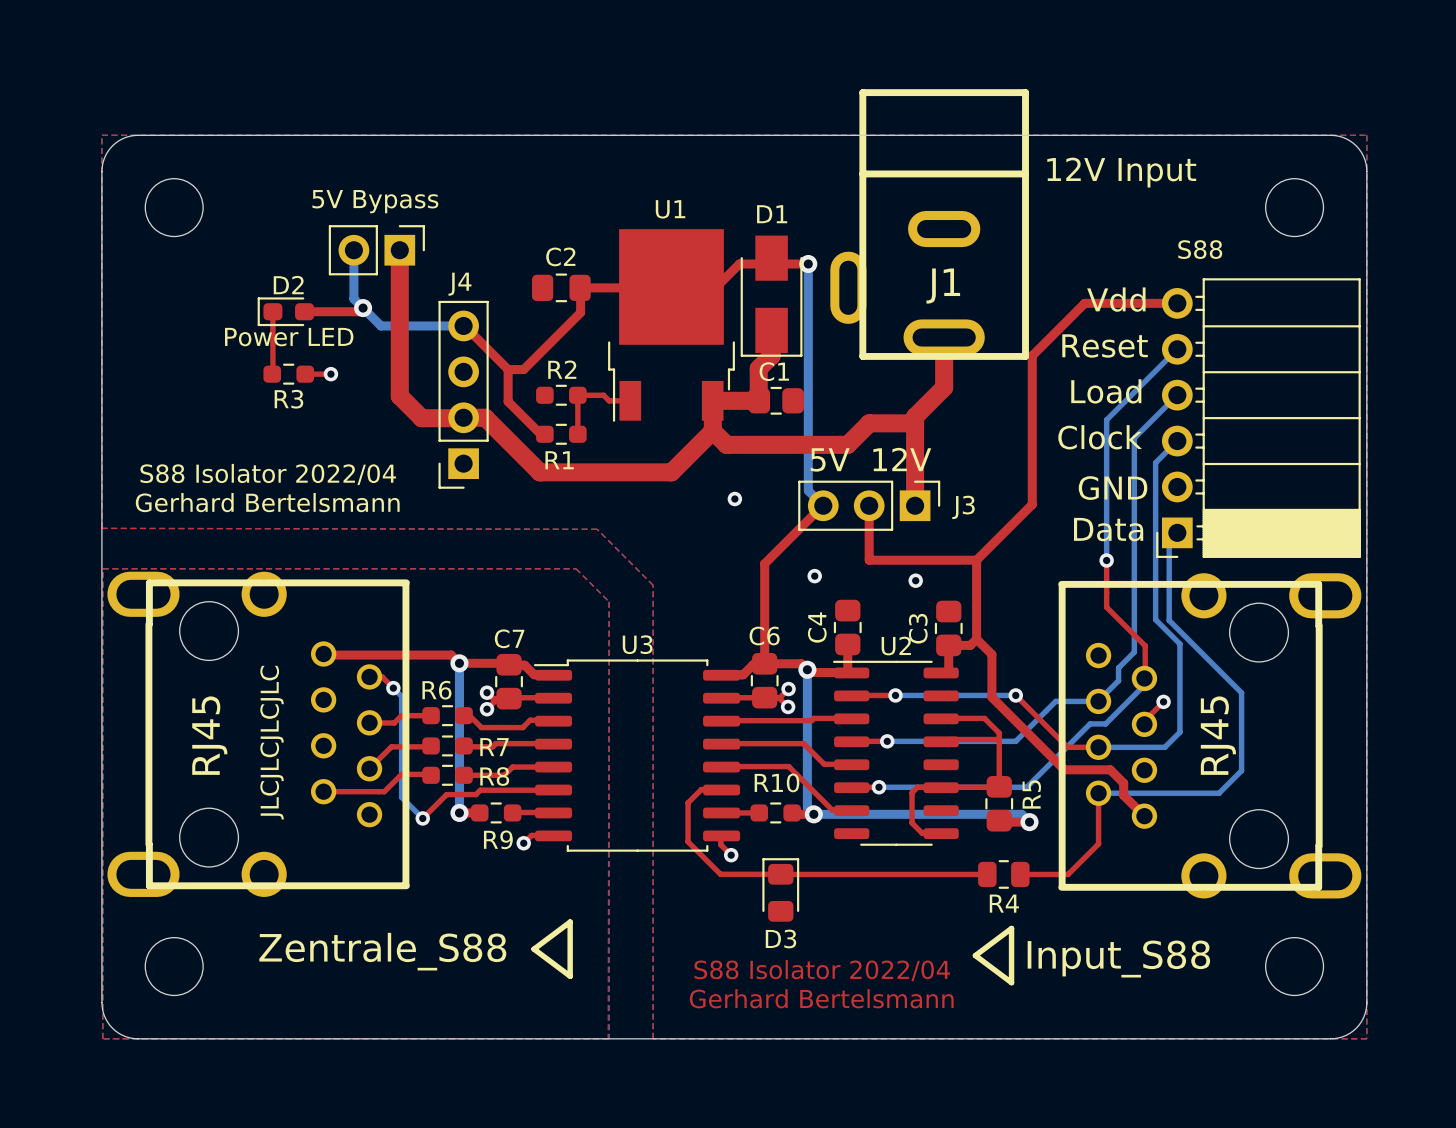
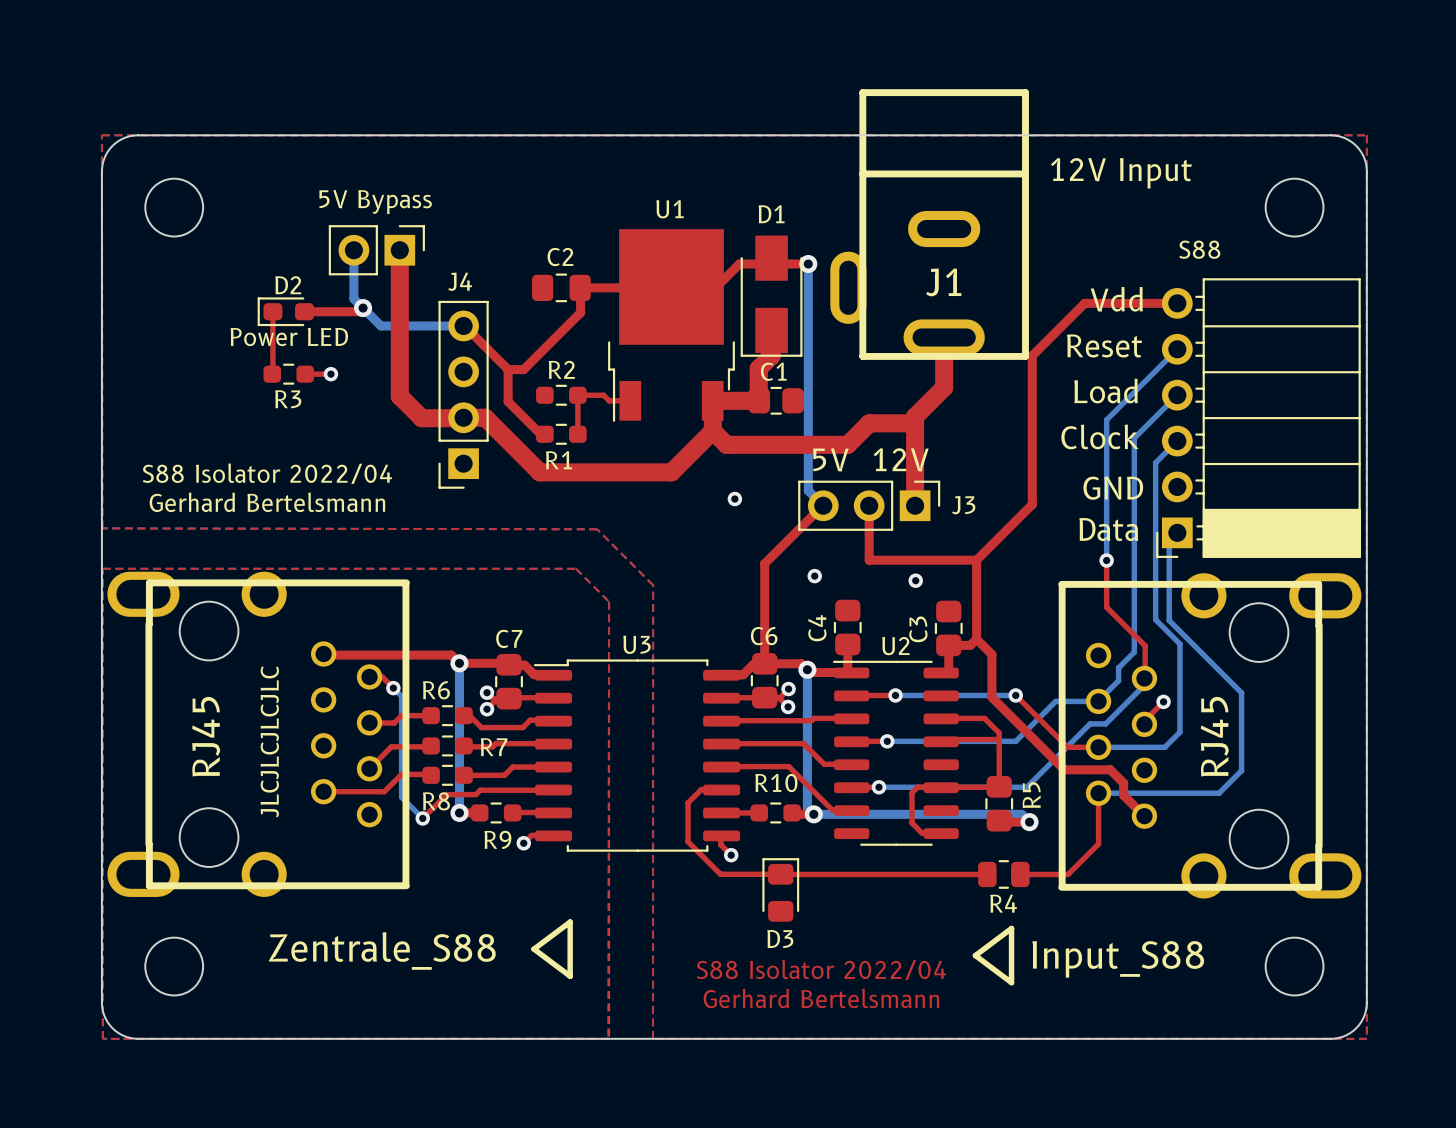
R8 name position: R8 (494, 776) -> R8 (436, 801)

